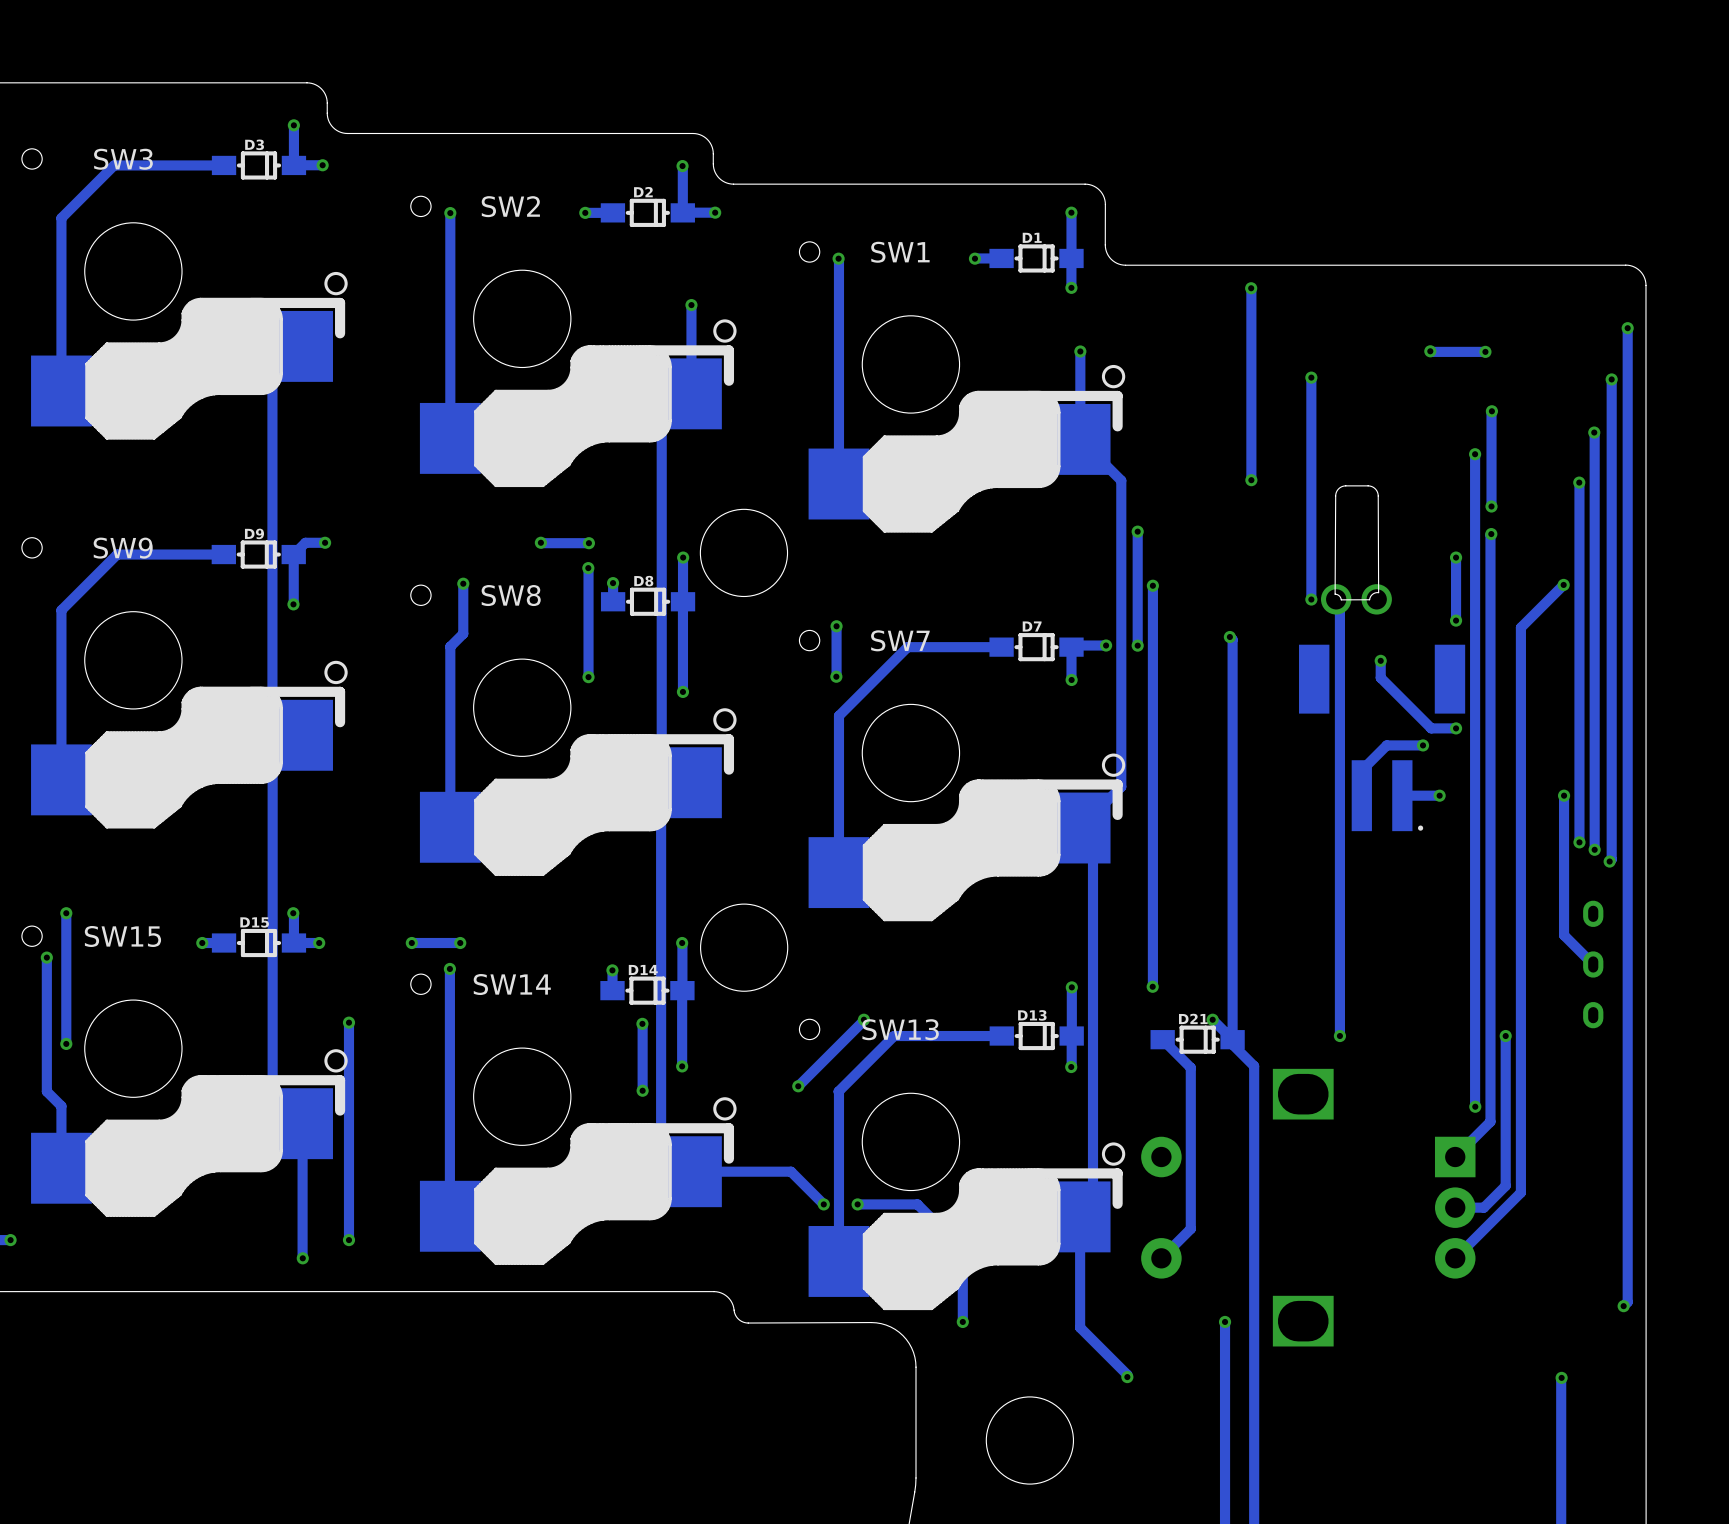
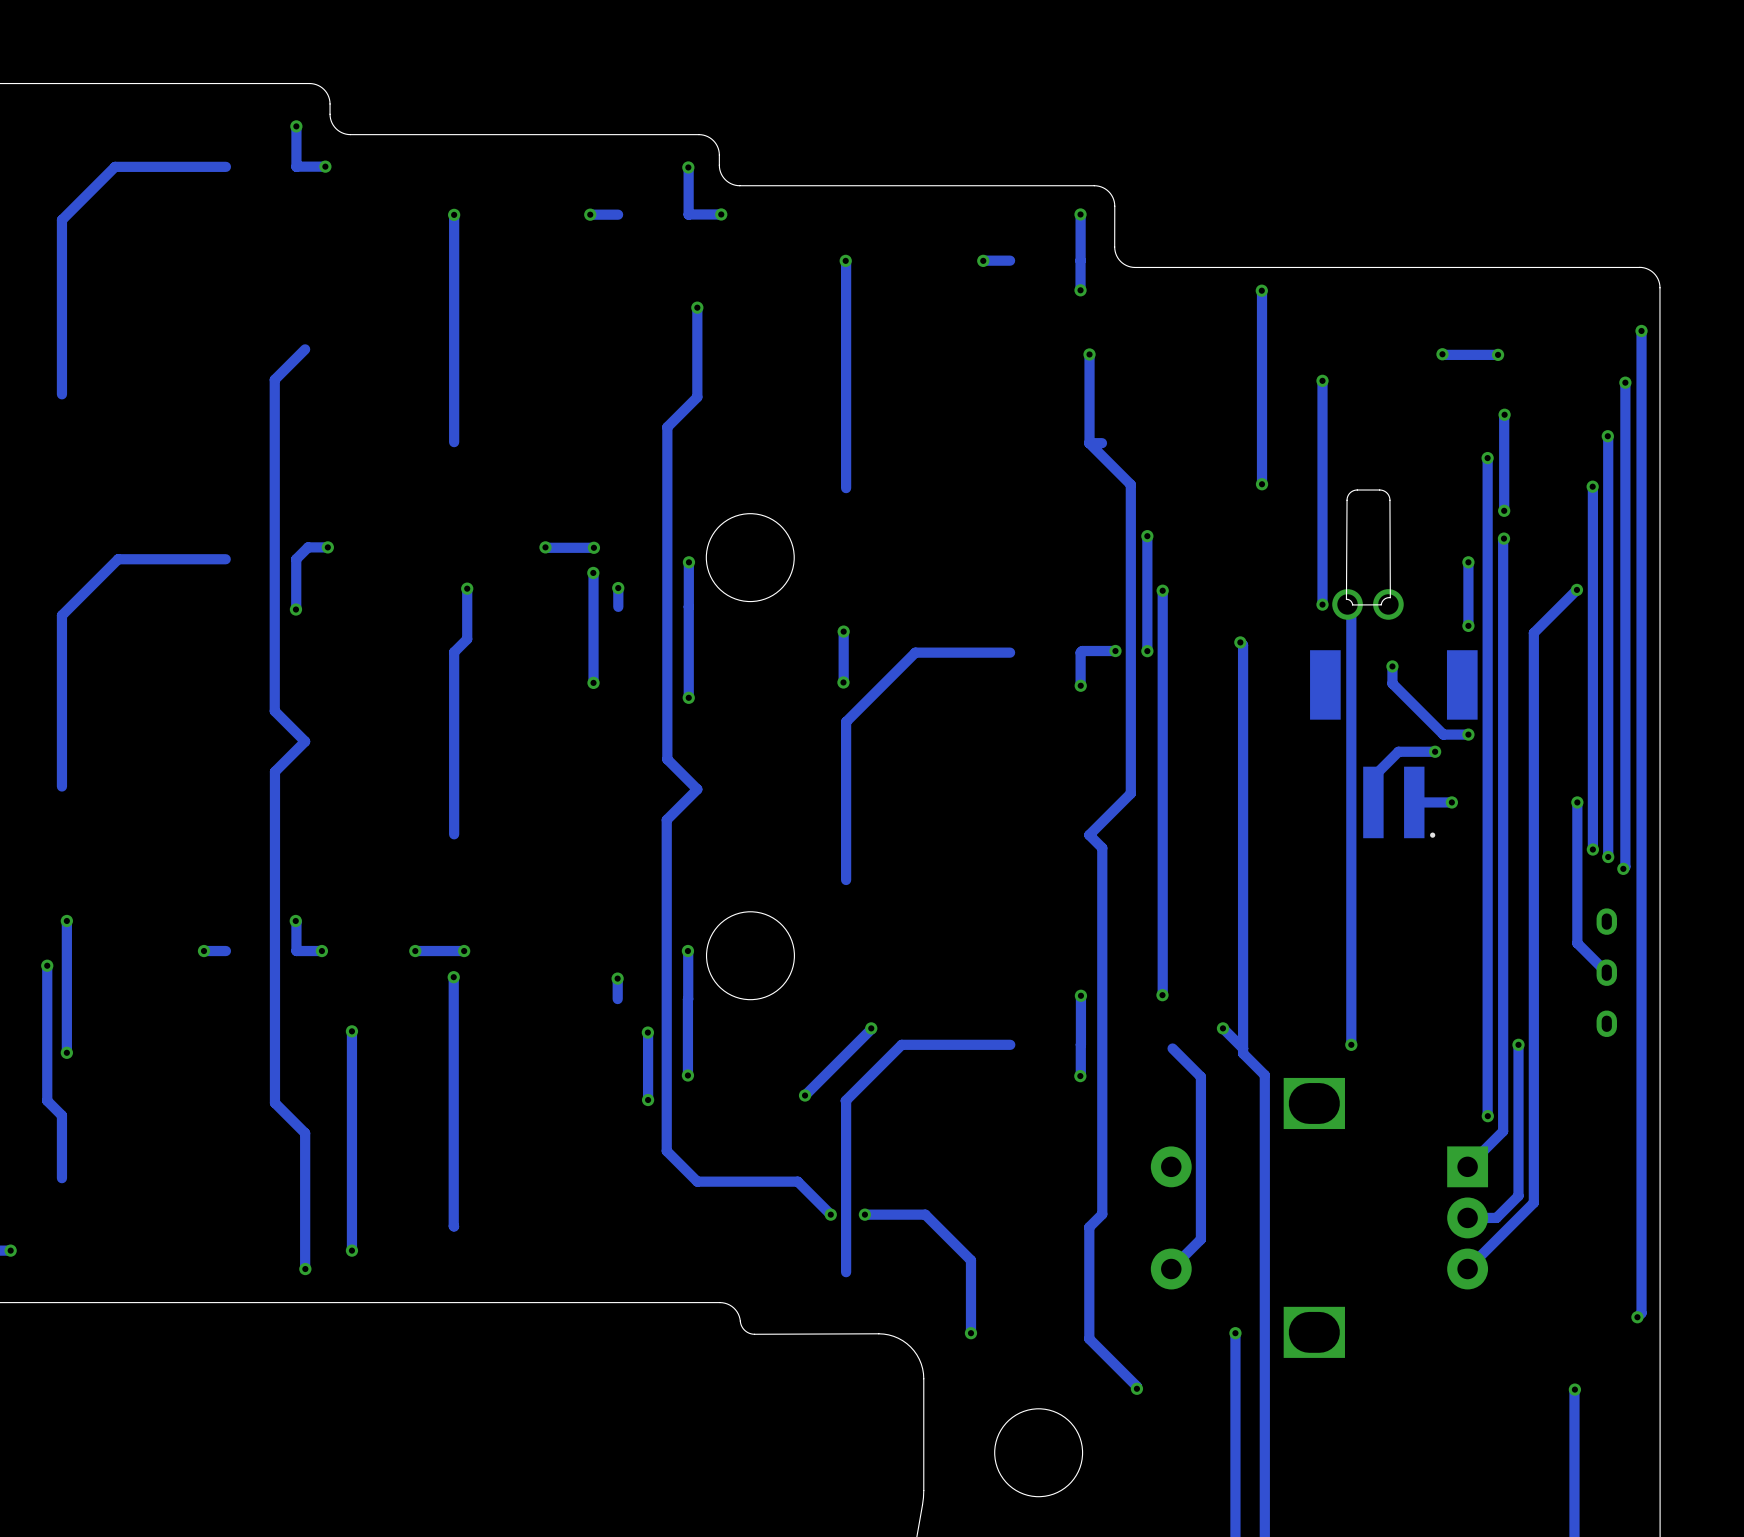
D3: (258, 165) -> none
D2: (647, 212) -> none
D1: (1036, 258) -> none
SW3: (184, 294) -> none
SW2: (573, 341) -> none
SW1: (962, 387) -> none
D9: (258, 554) -> none
D8: (648, 601) -> none
D7: (1036, 647) -> none
SW9: (184, 683) -> none
SW8: (573, 730) -> none
SW7: (962, 775) -> none
D15: (258, 943) -> none
D14: (647, 990) -> none
D13: (1036, 1036) -> none
D21: (1197, 1039) -> none
SW15: (184, 1071) -> none
SW14: (573, 1119) -> none
SW13: (962, 1164) -> none

